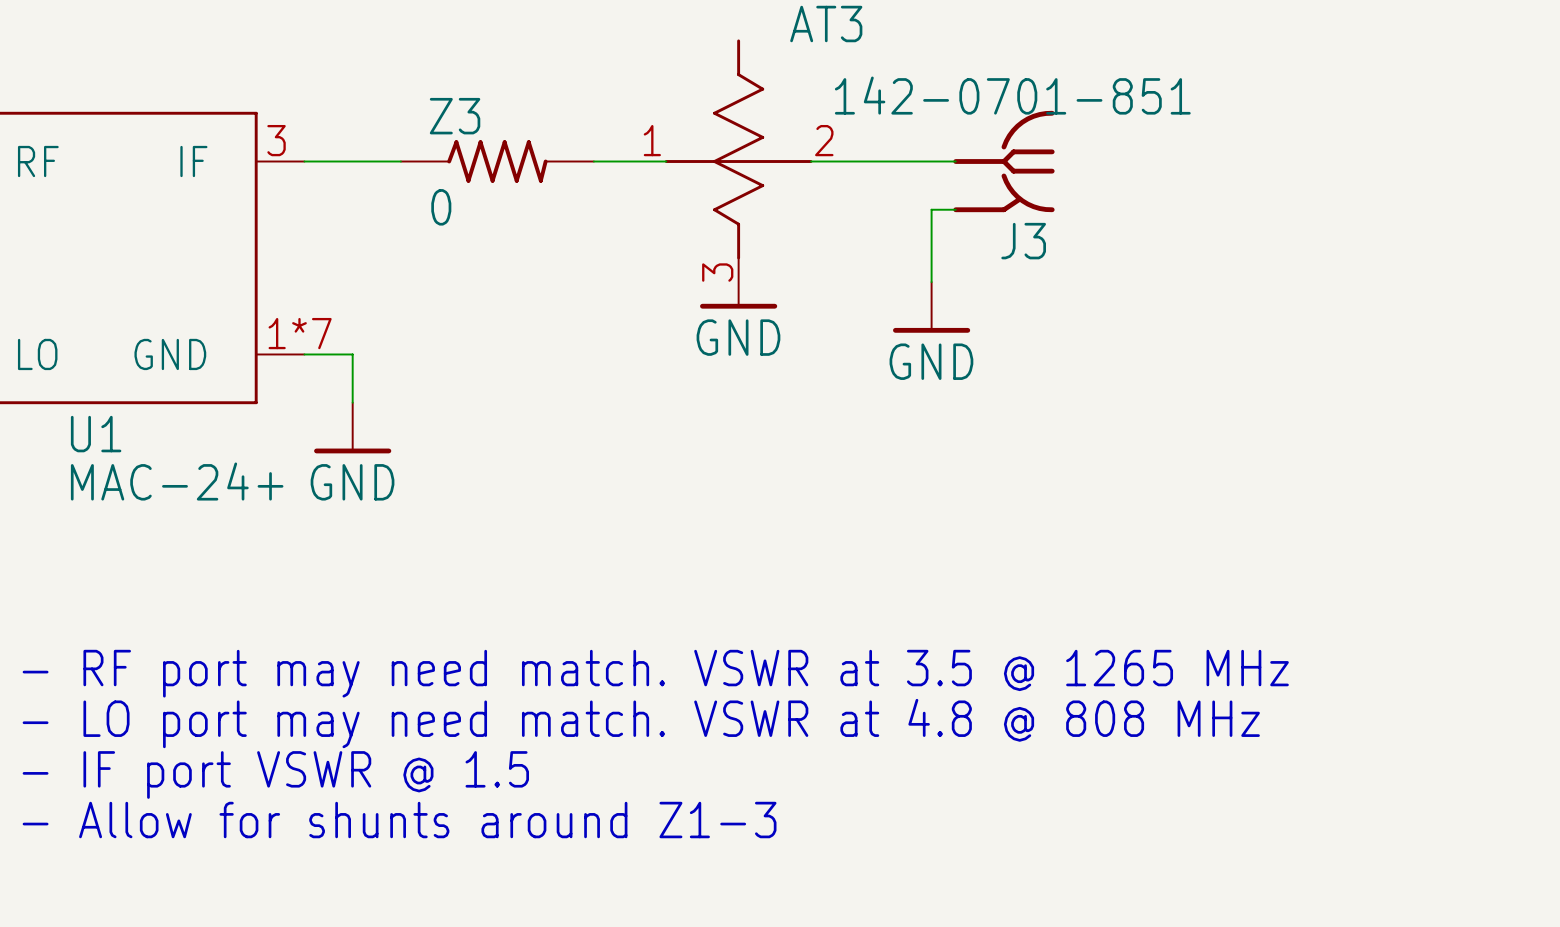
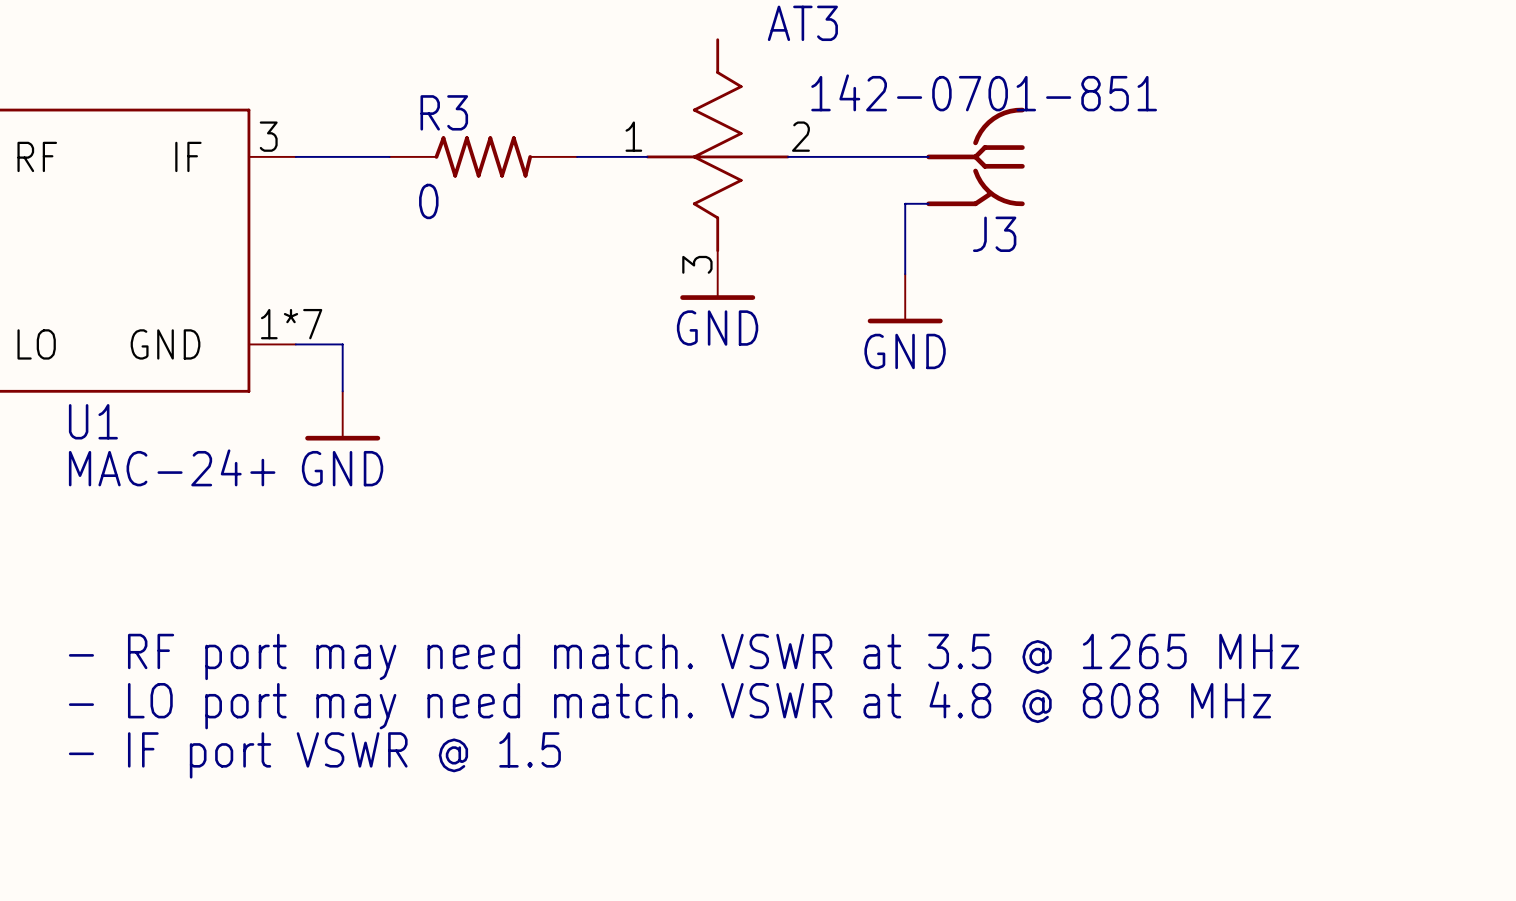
Z3 name: Z3 (455, 116) -> R3 (444, 112)
text position: - RF port may need match. VSWR at 3.5 @ 1265 MHz (655, 673) -> - RF port may need match. VSWR at 3.5 @ 1265 MHz (684, 656)
text position: - LO port may need match. VSWR at 4.8 @ 808 MHz (641, 723) -> - LO port may need match. VSWR at 4.8 @ 808 MHz (669, 705)
text position: - IF port VSWR @ 1.5 (275, 774) -> - IF port VSWR @ 1.5 (314, 755)
text: - Allow for shunts around Z1-3 (399, 820) -> none

